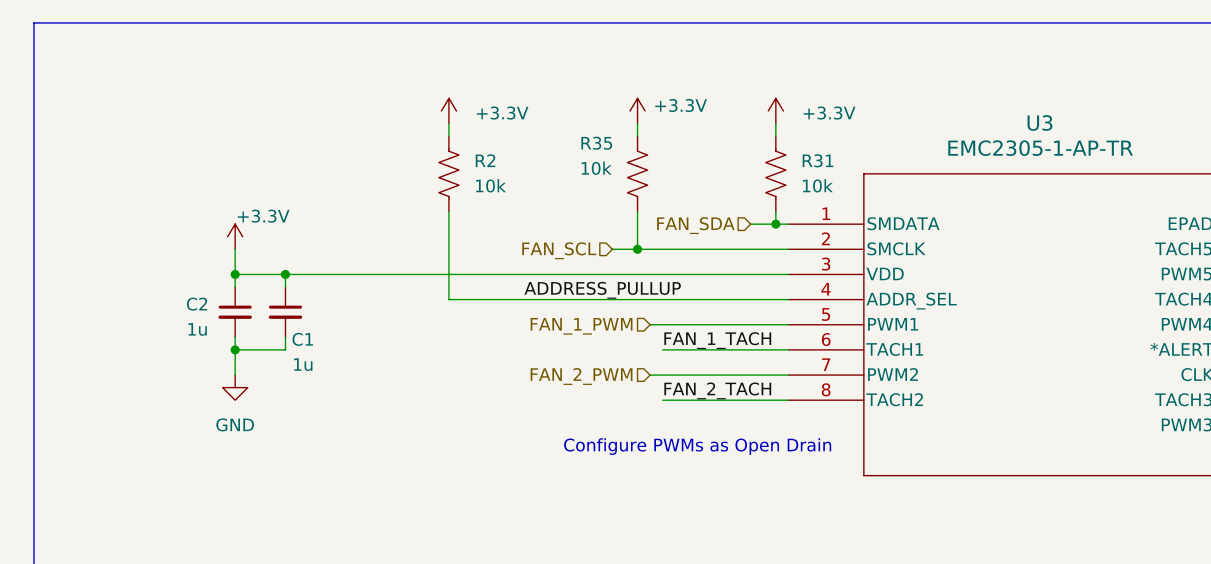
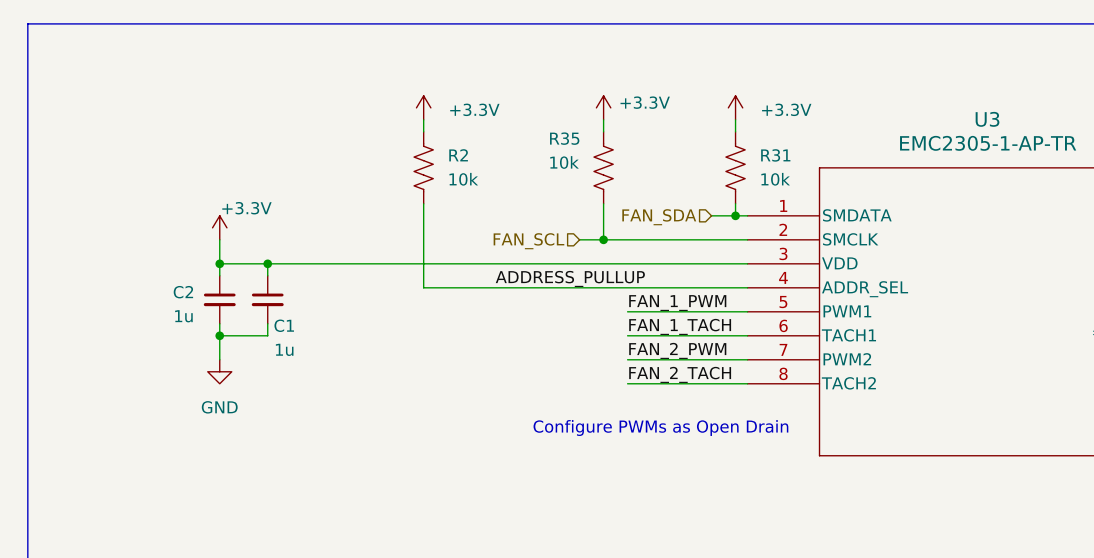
label: none -> FAN_1_PWM (677, 303)
wire: (650, 324) (662, 324) -> none
hierarchical label: FAN_1_PWM (581, 326) -> none
label: none -> FAN_2_PWM (677, 350)
wire: (650, 375) (662, 375) -> none
hierarchical label: FAN_2_PWM (581, 376) -> none

